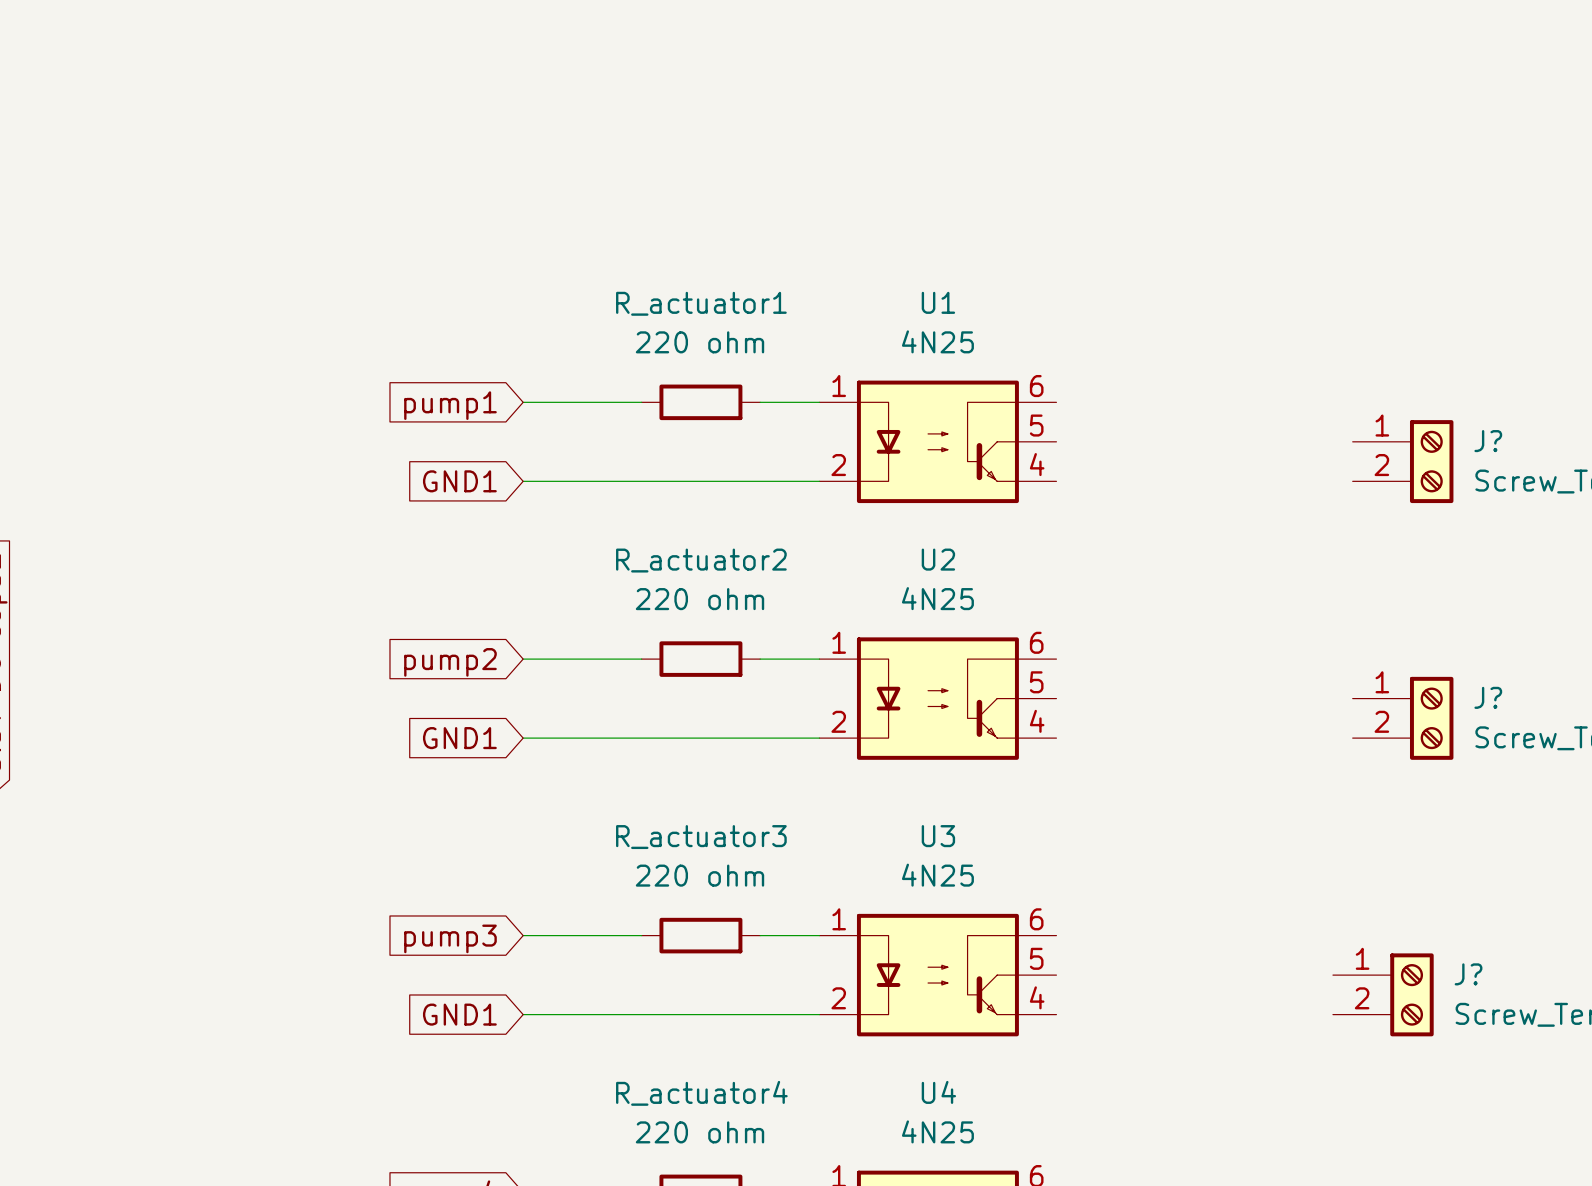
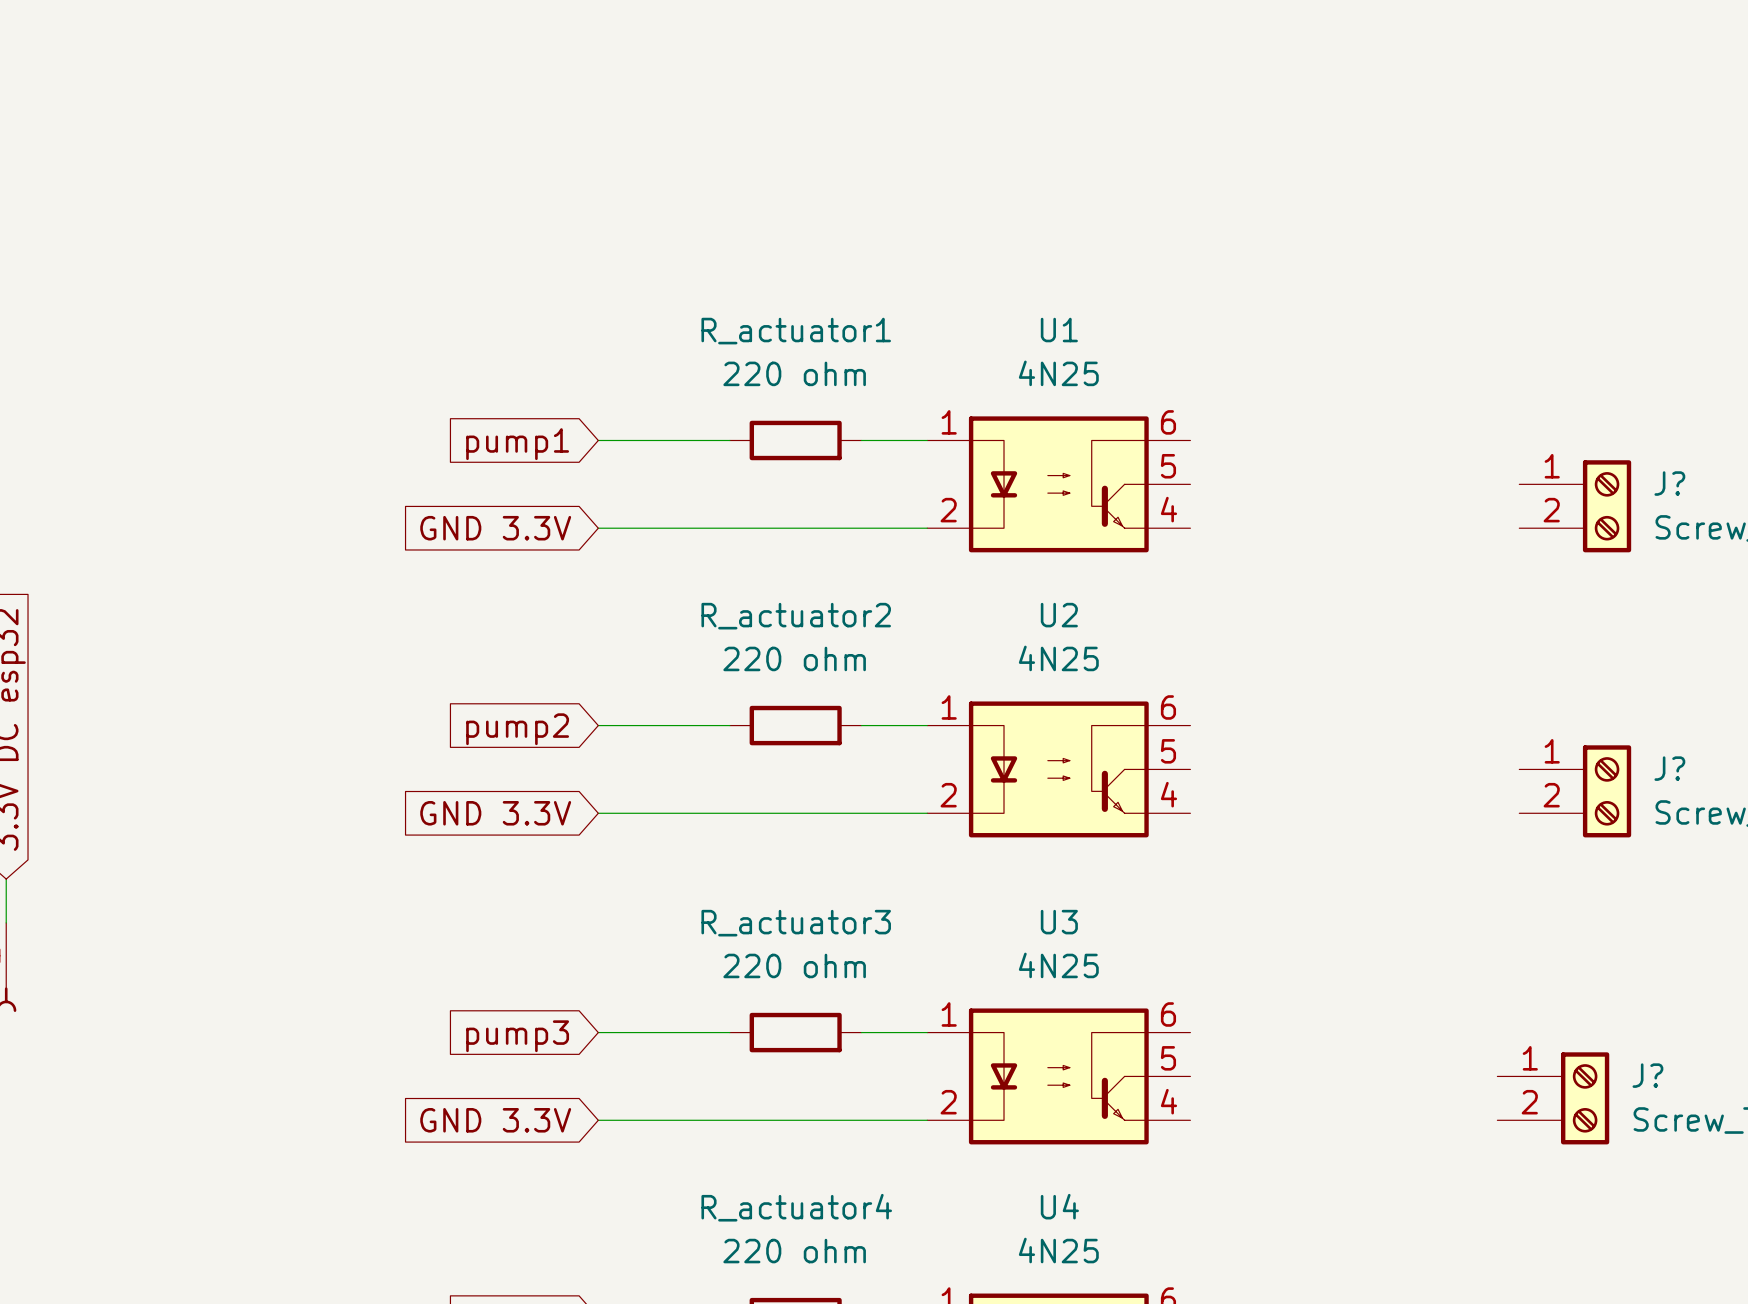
global label: GND1 (459, 481) -> GND 3.3V (495, 528)
global label: GND1 (459, 738) -> GND 3.3V (495, 813)
global label: GND1 (459, 1014) -> GND 3.3V (495, 1120)

